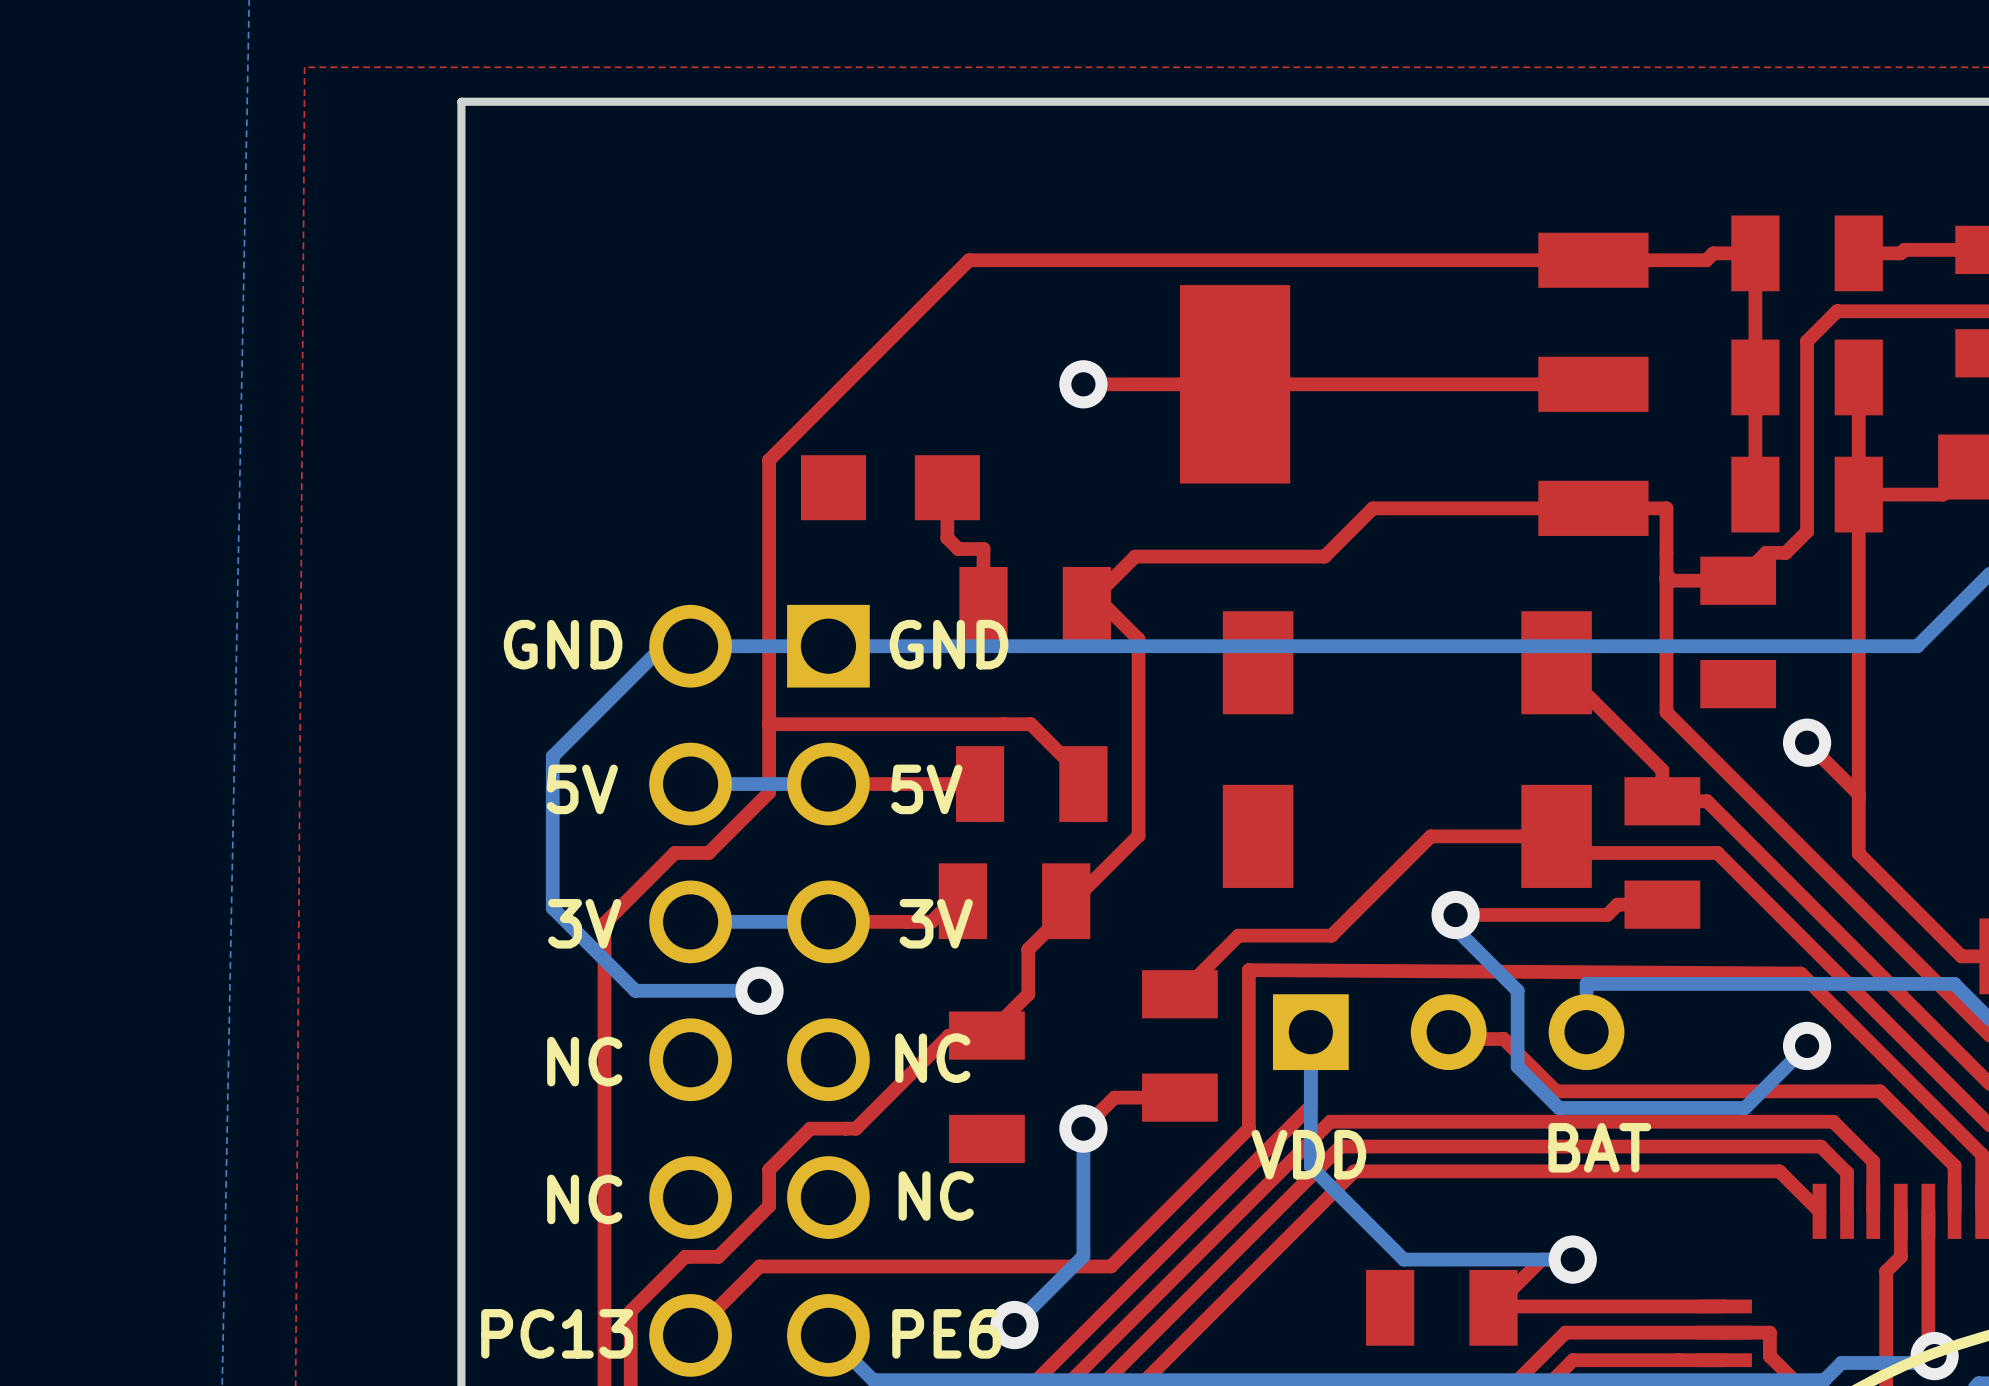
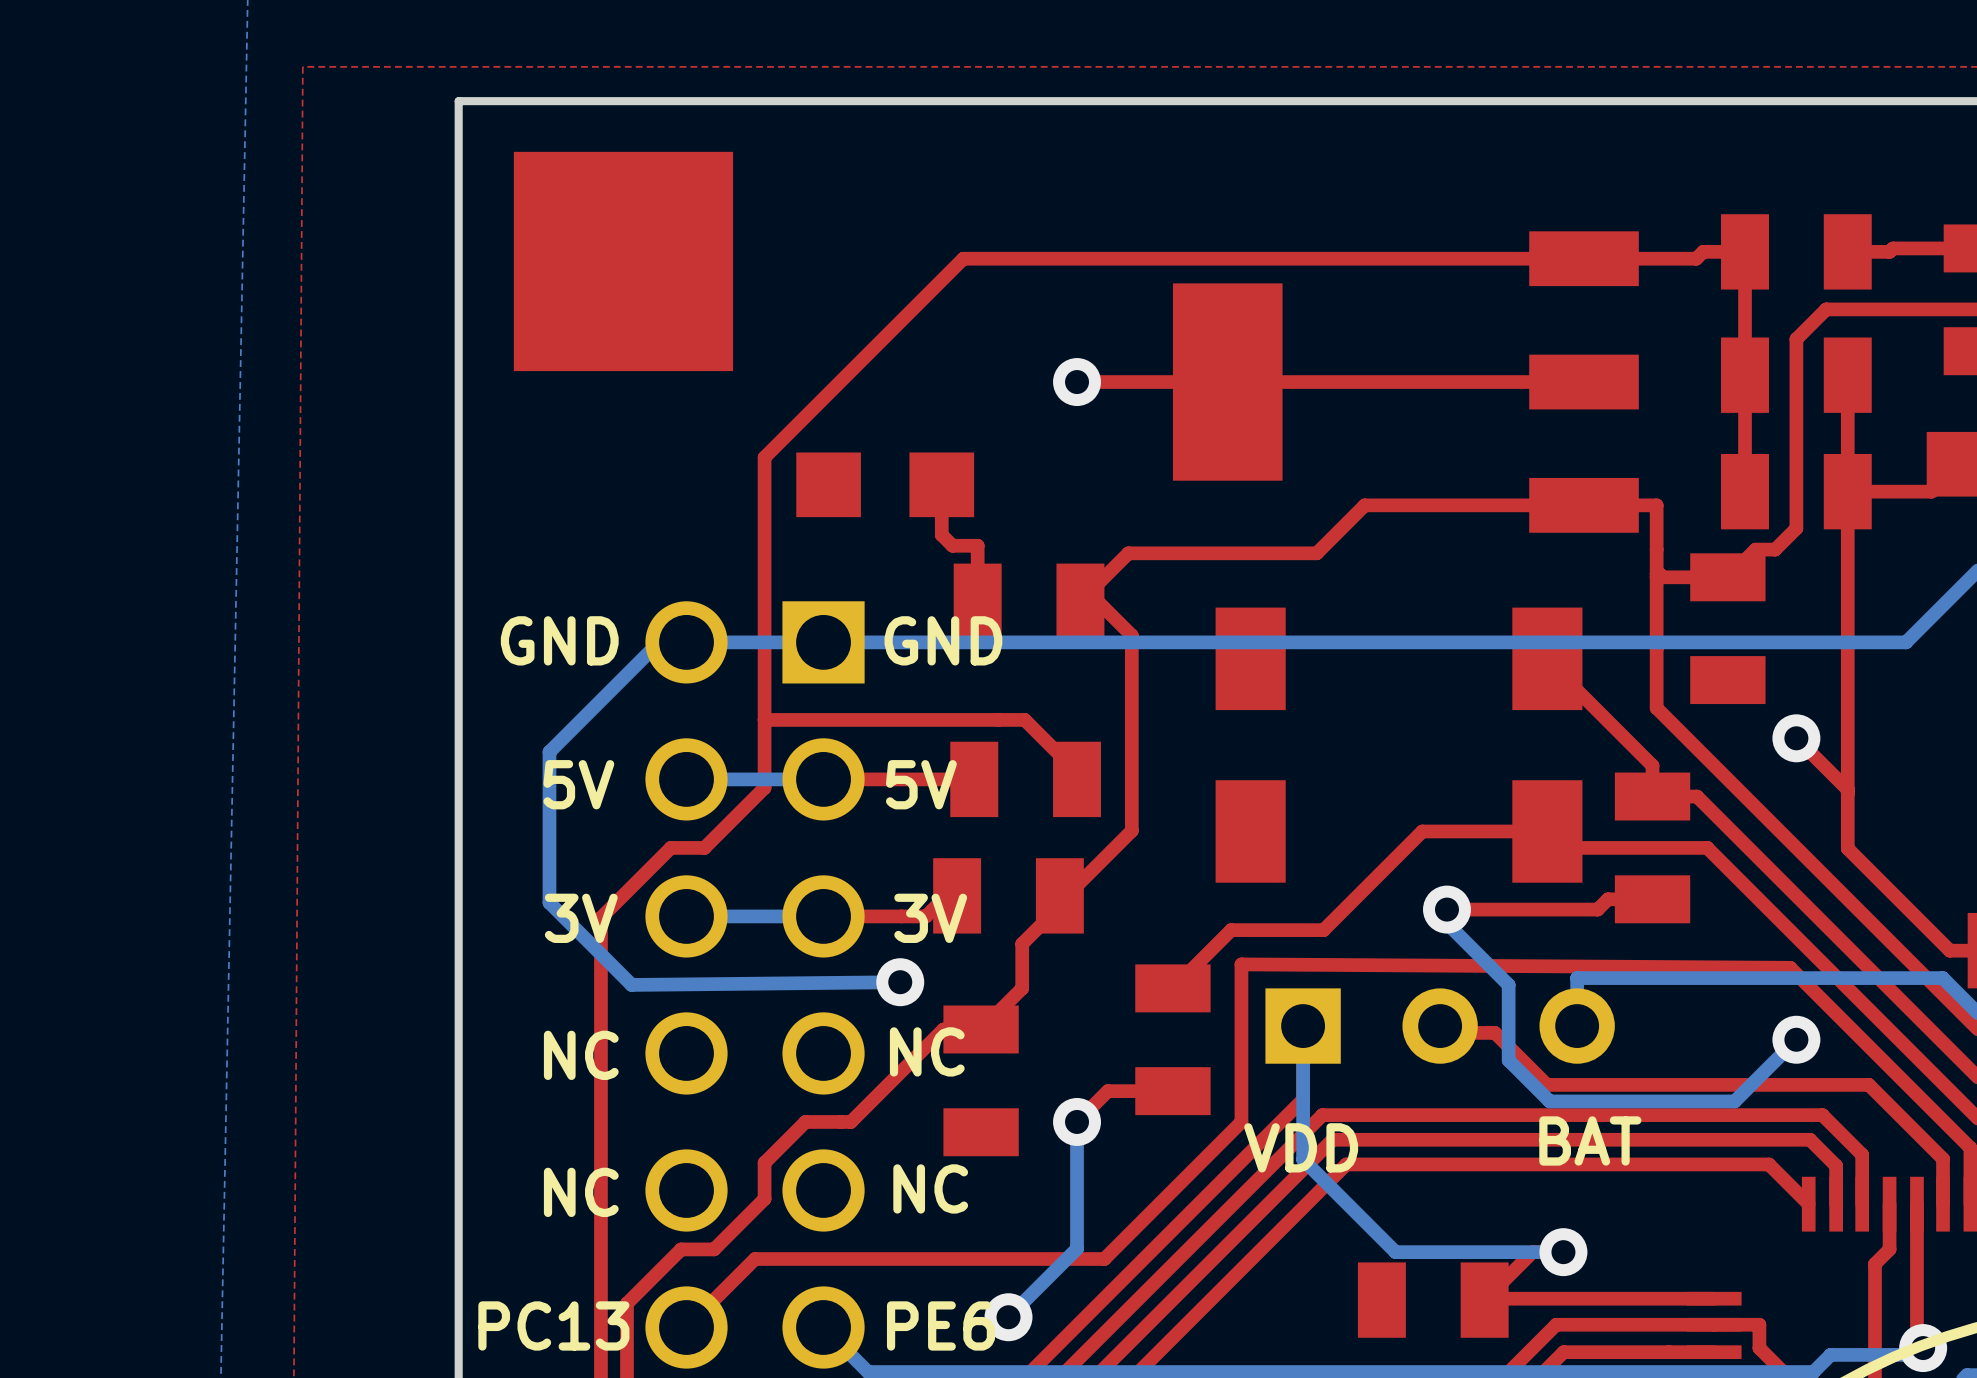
part: none -> (623, 261)
bottom track: (759, 990) (635, 990) -> (900, 982) (631, 984)
via position: (759, 990) -> (900, 982)

